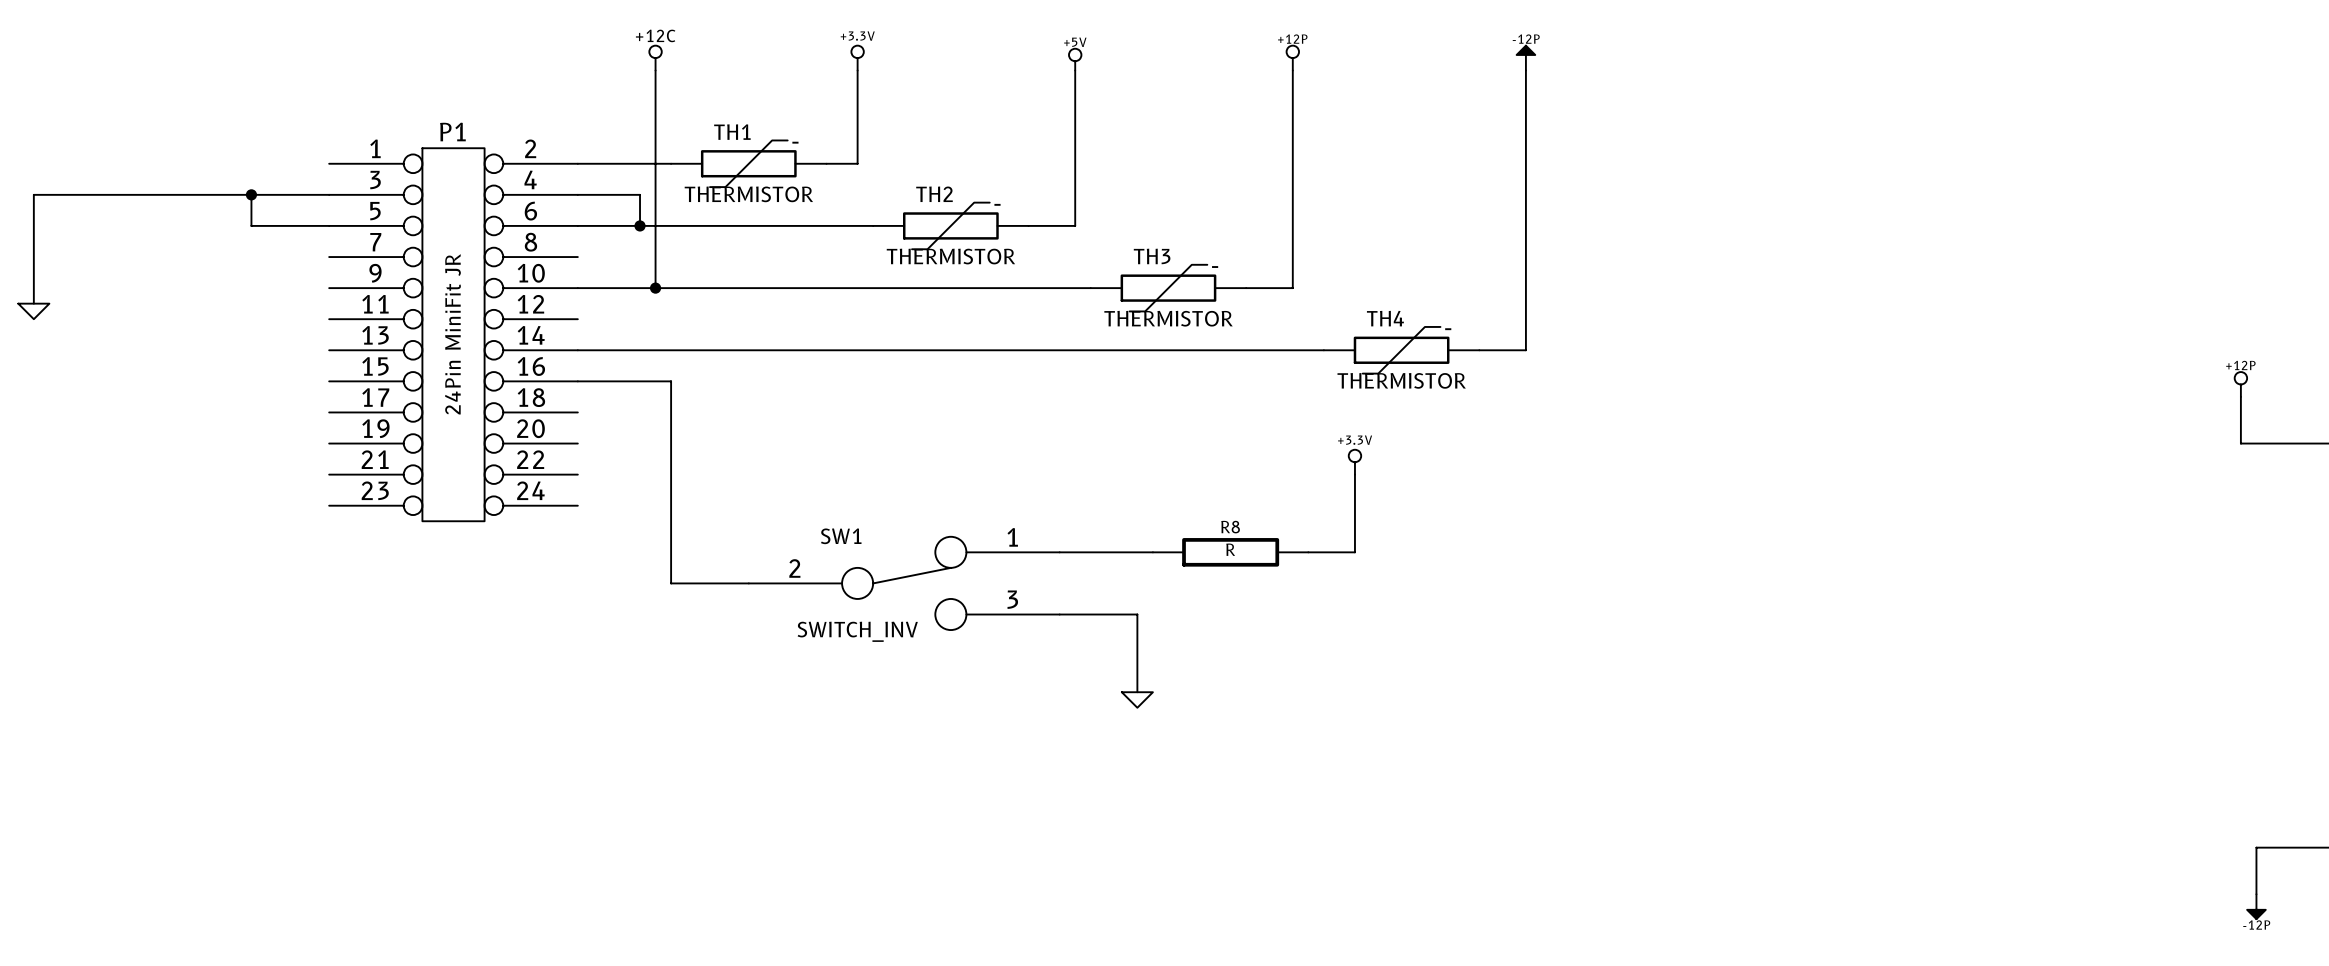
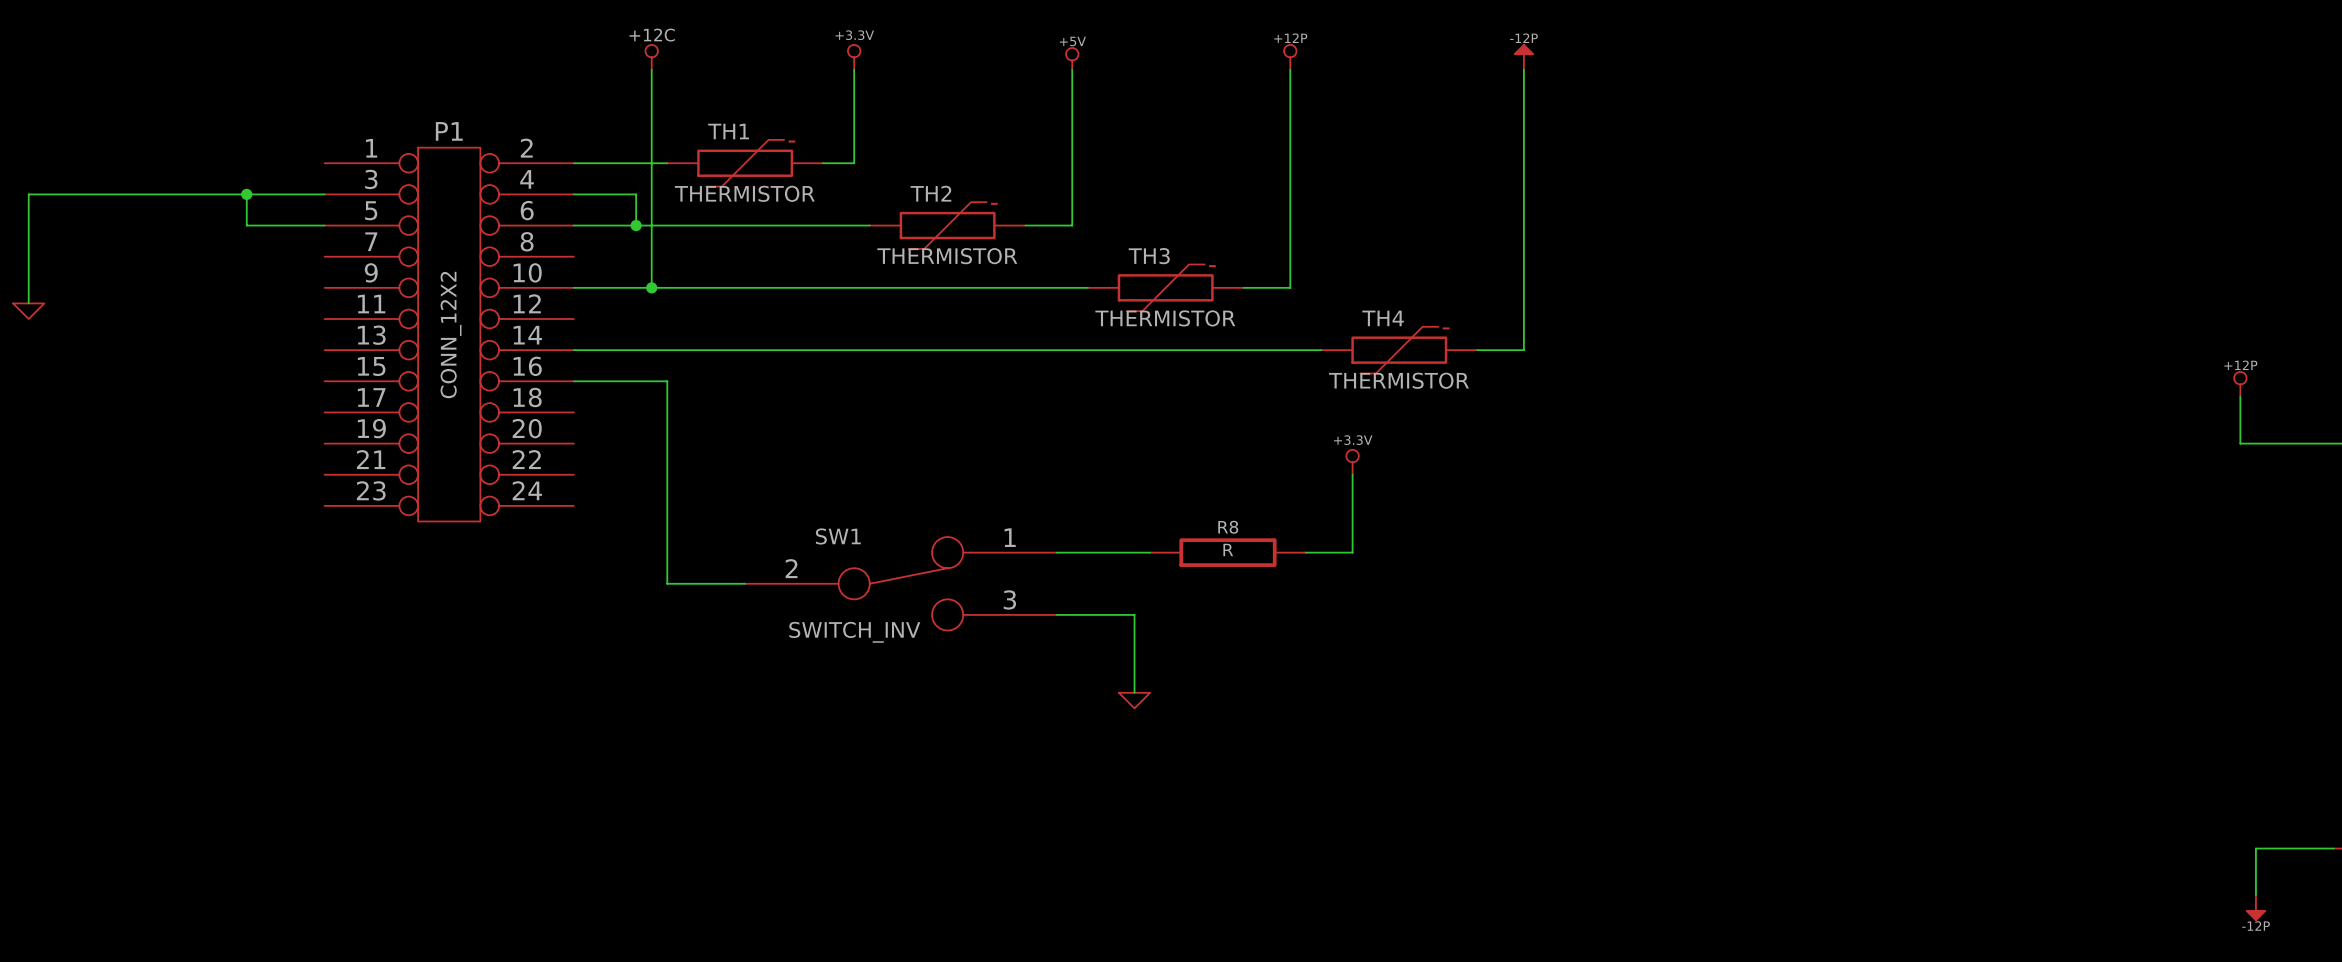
P1 value: 24Pin MiniFit JR (453, 334) -> CONN_12X2 (451, 335)

